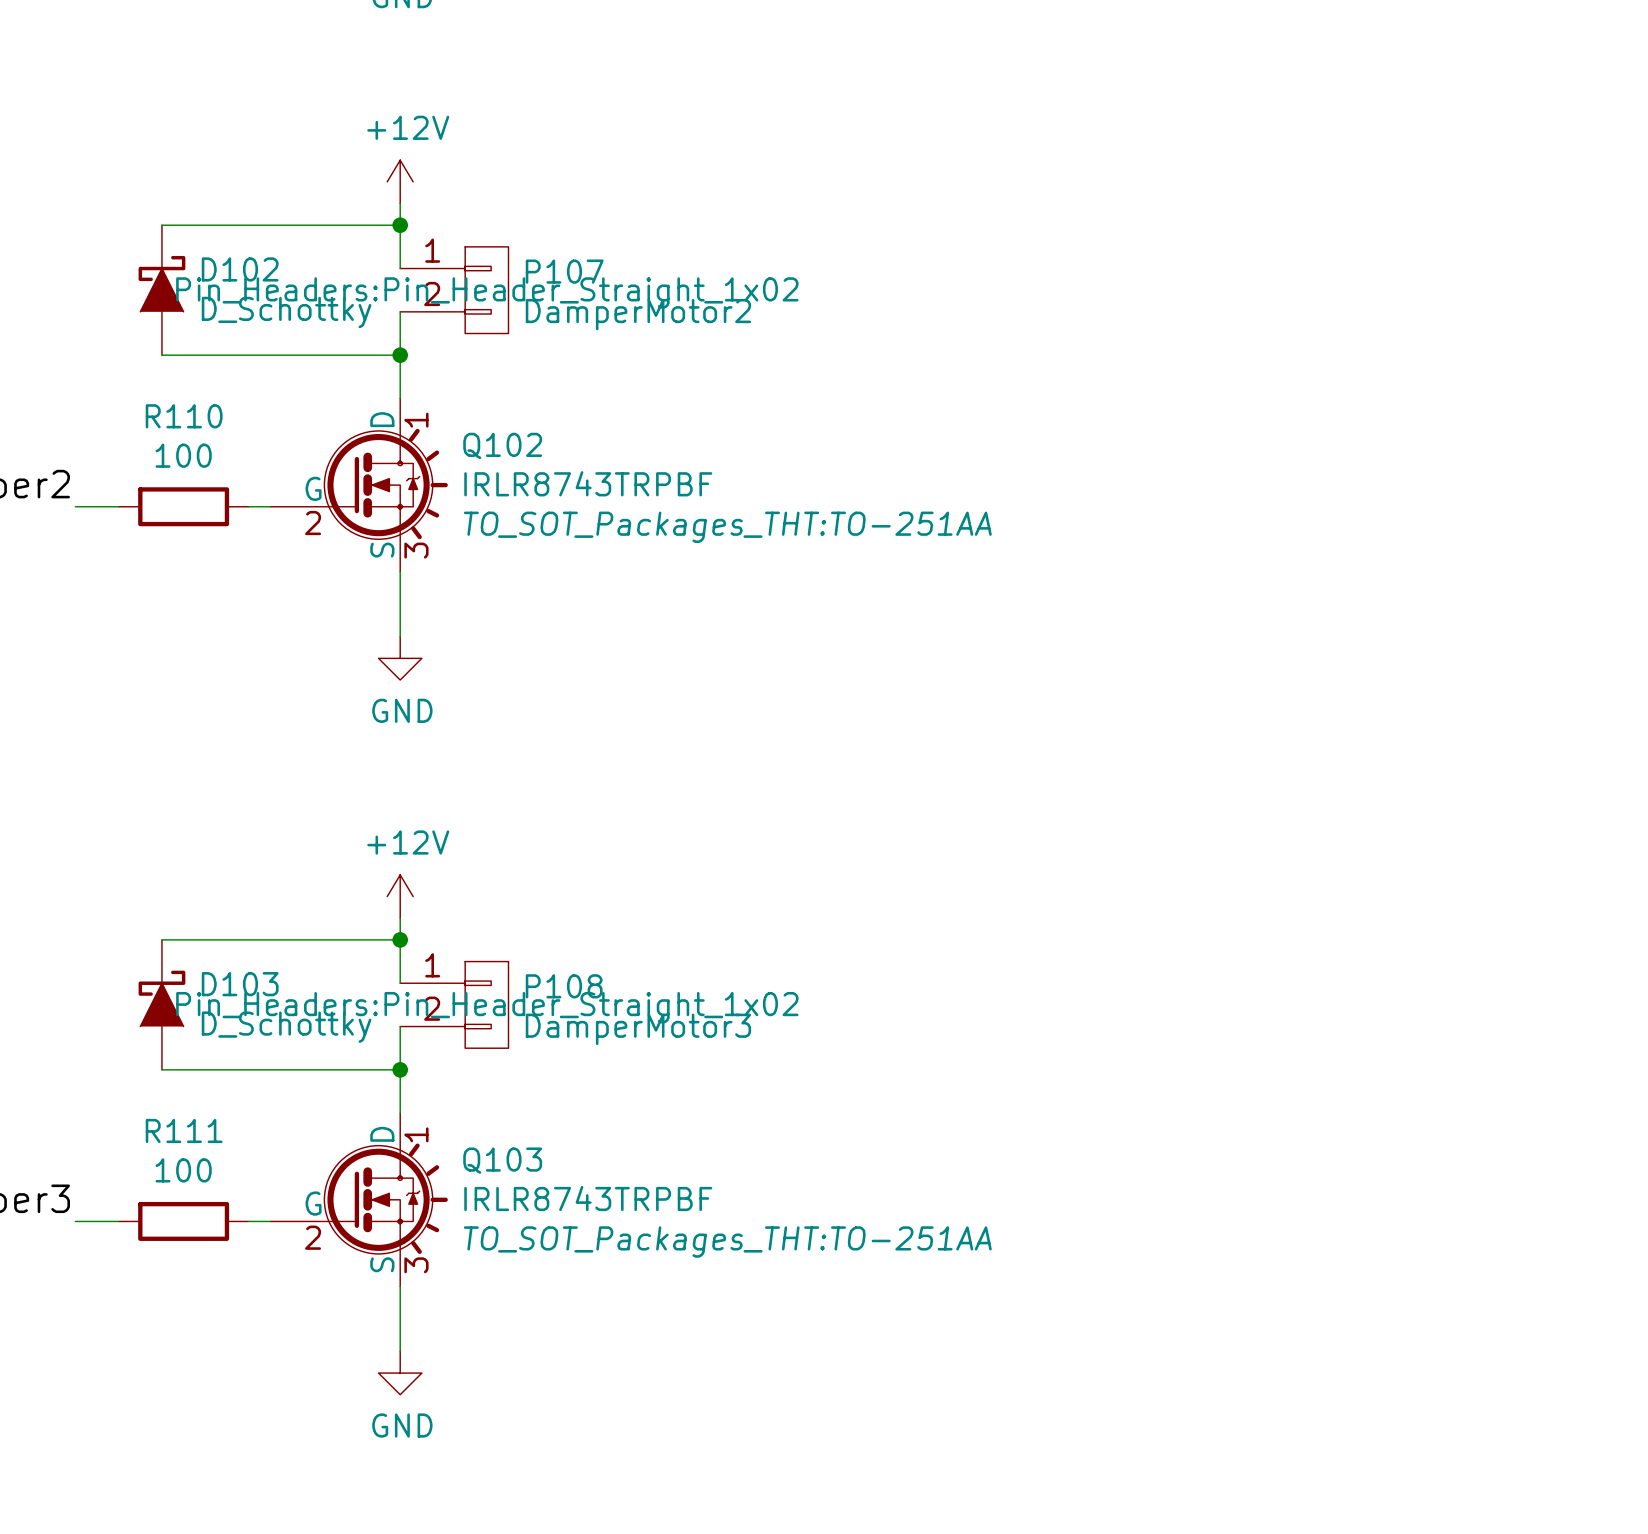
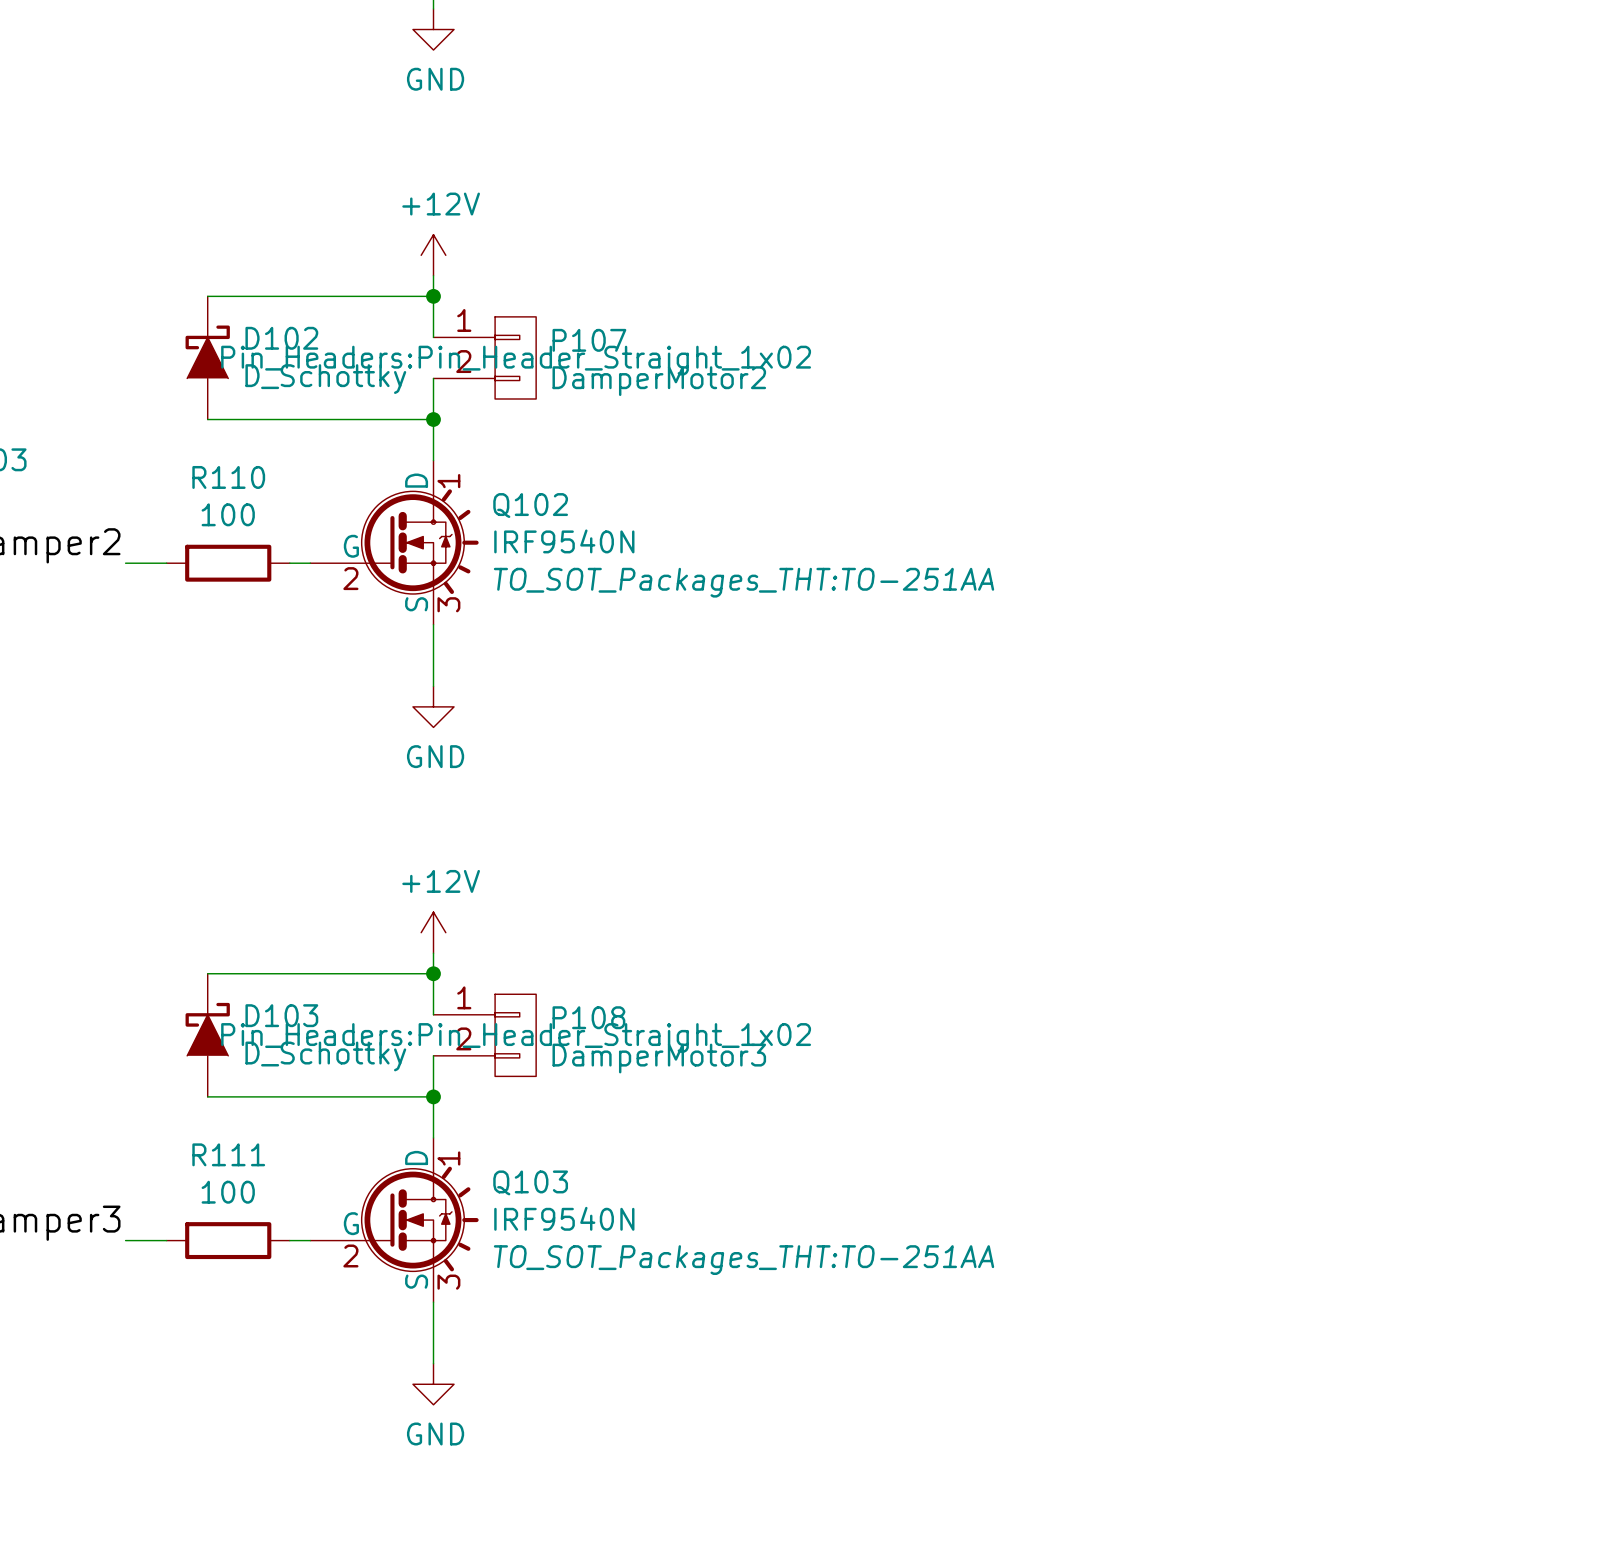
Q102 value: IRLR8743TRPBF (588, 483) -> IRF9540N (564, 541)
Q103 value: IRLR8743TRPBF (588, 1198) -> IRF9540N (564, 1218)

